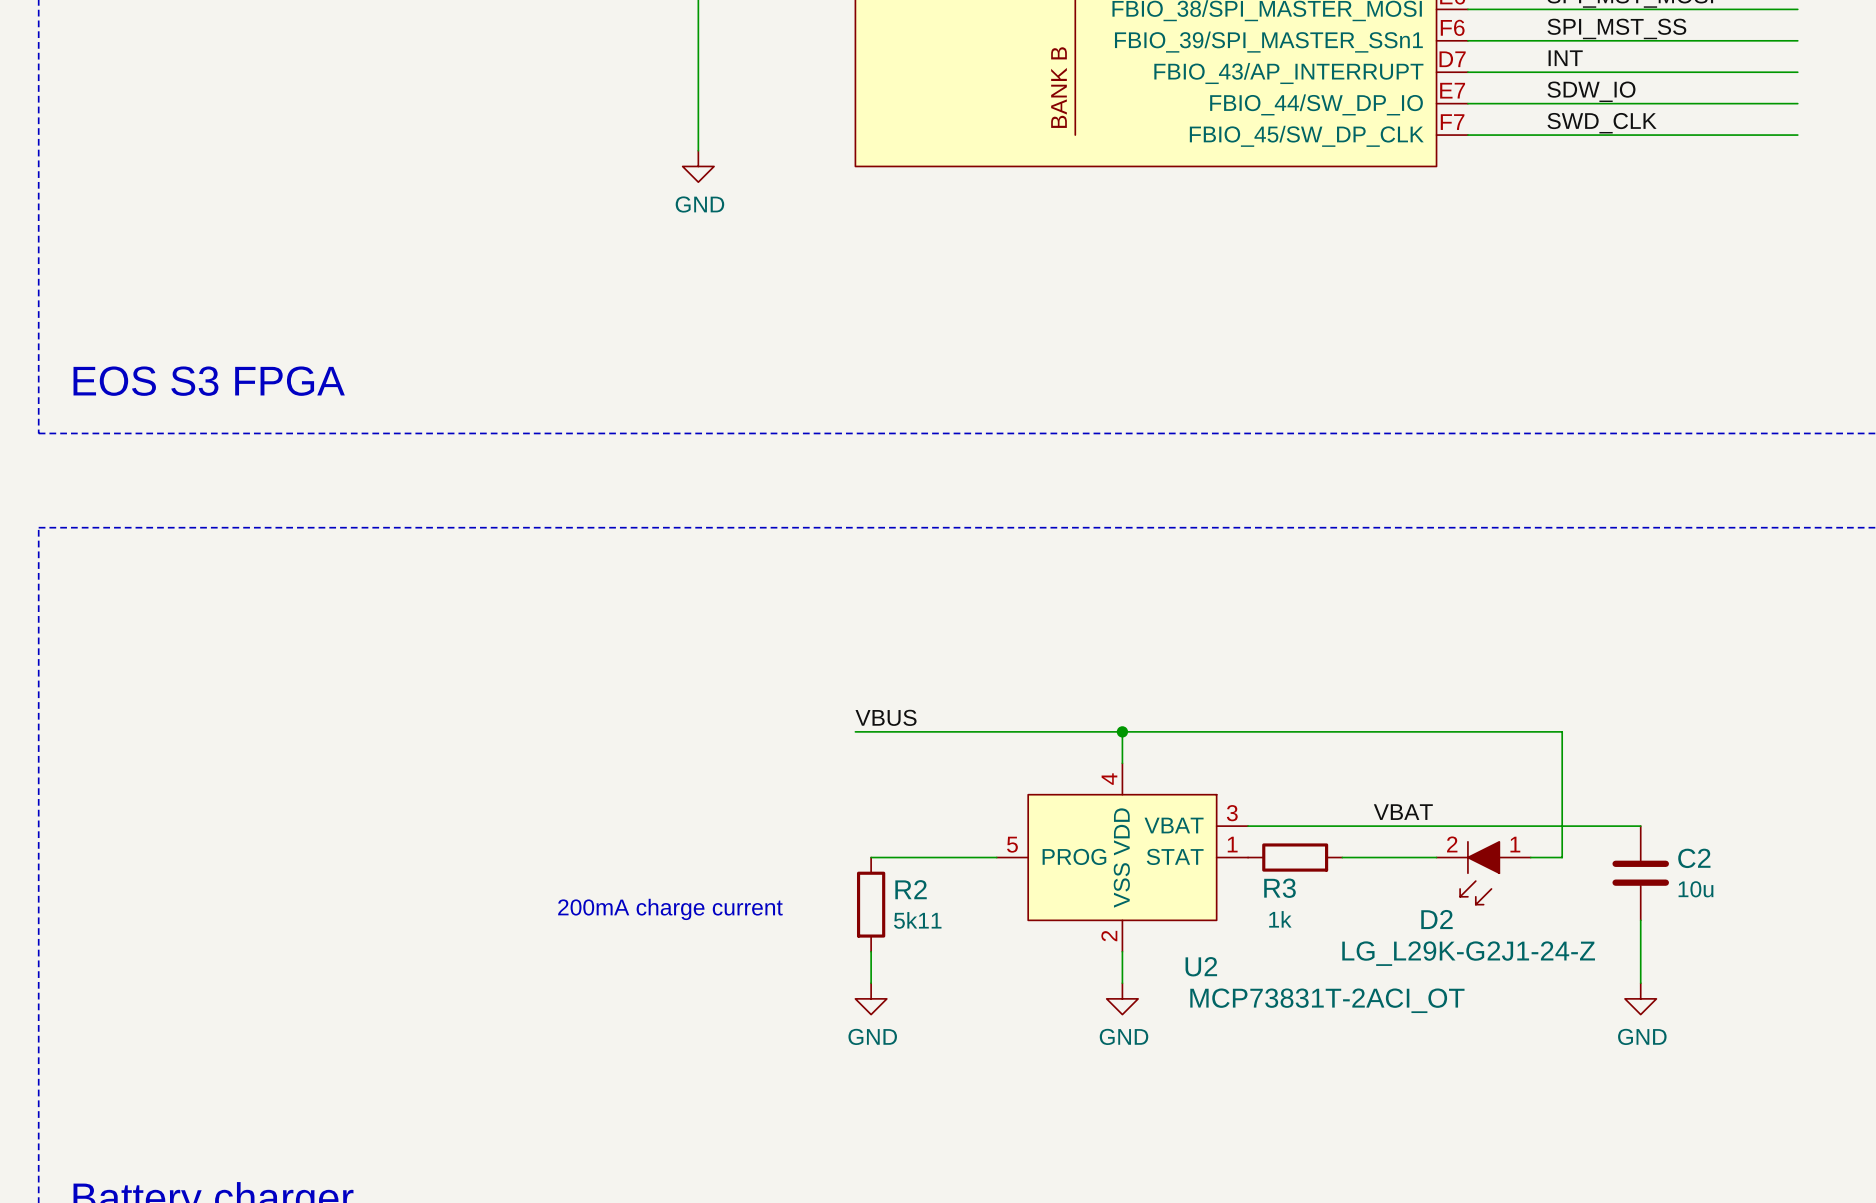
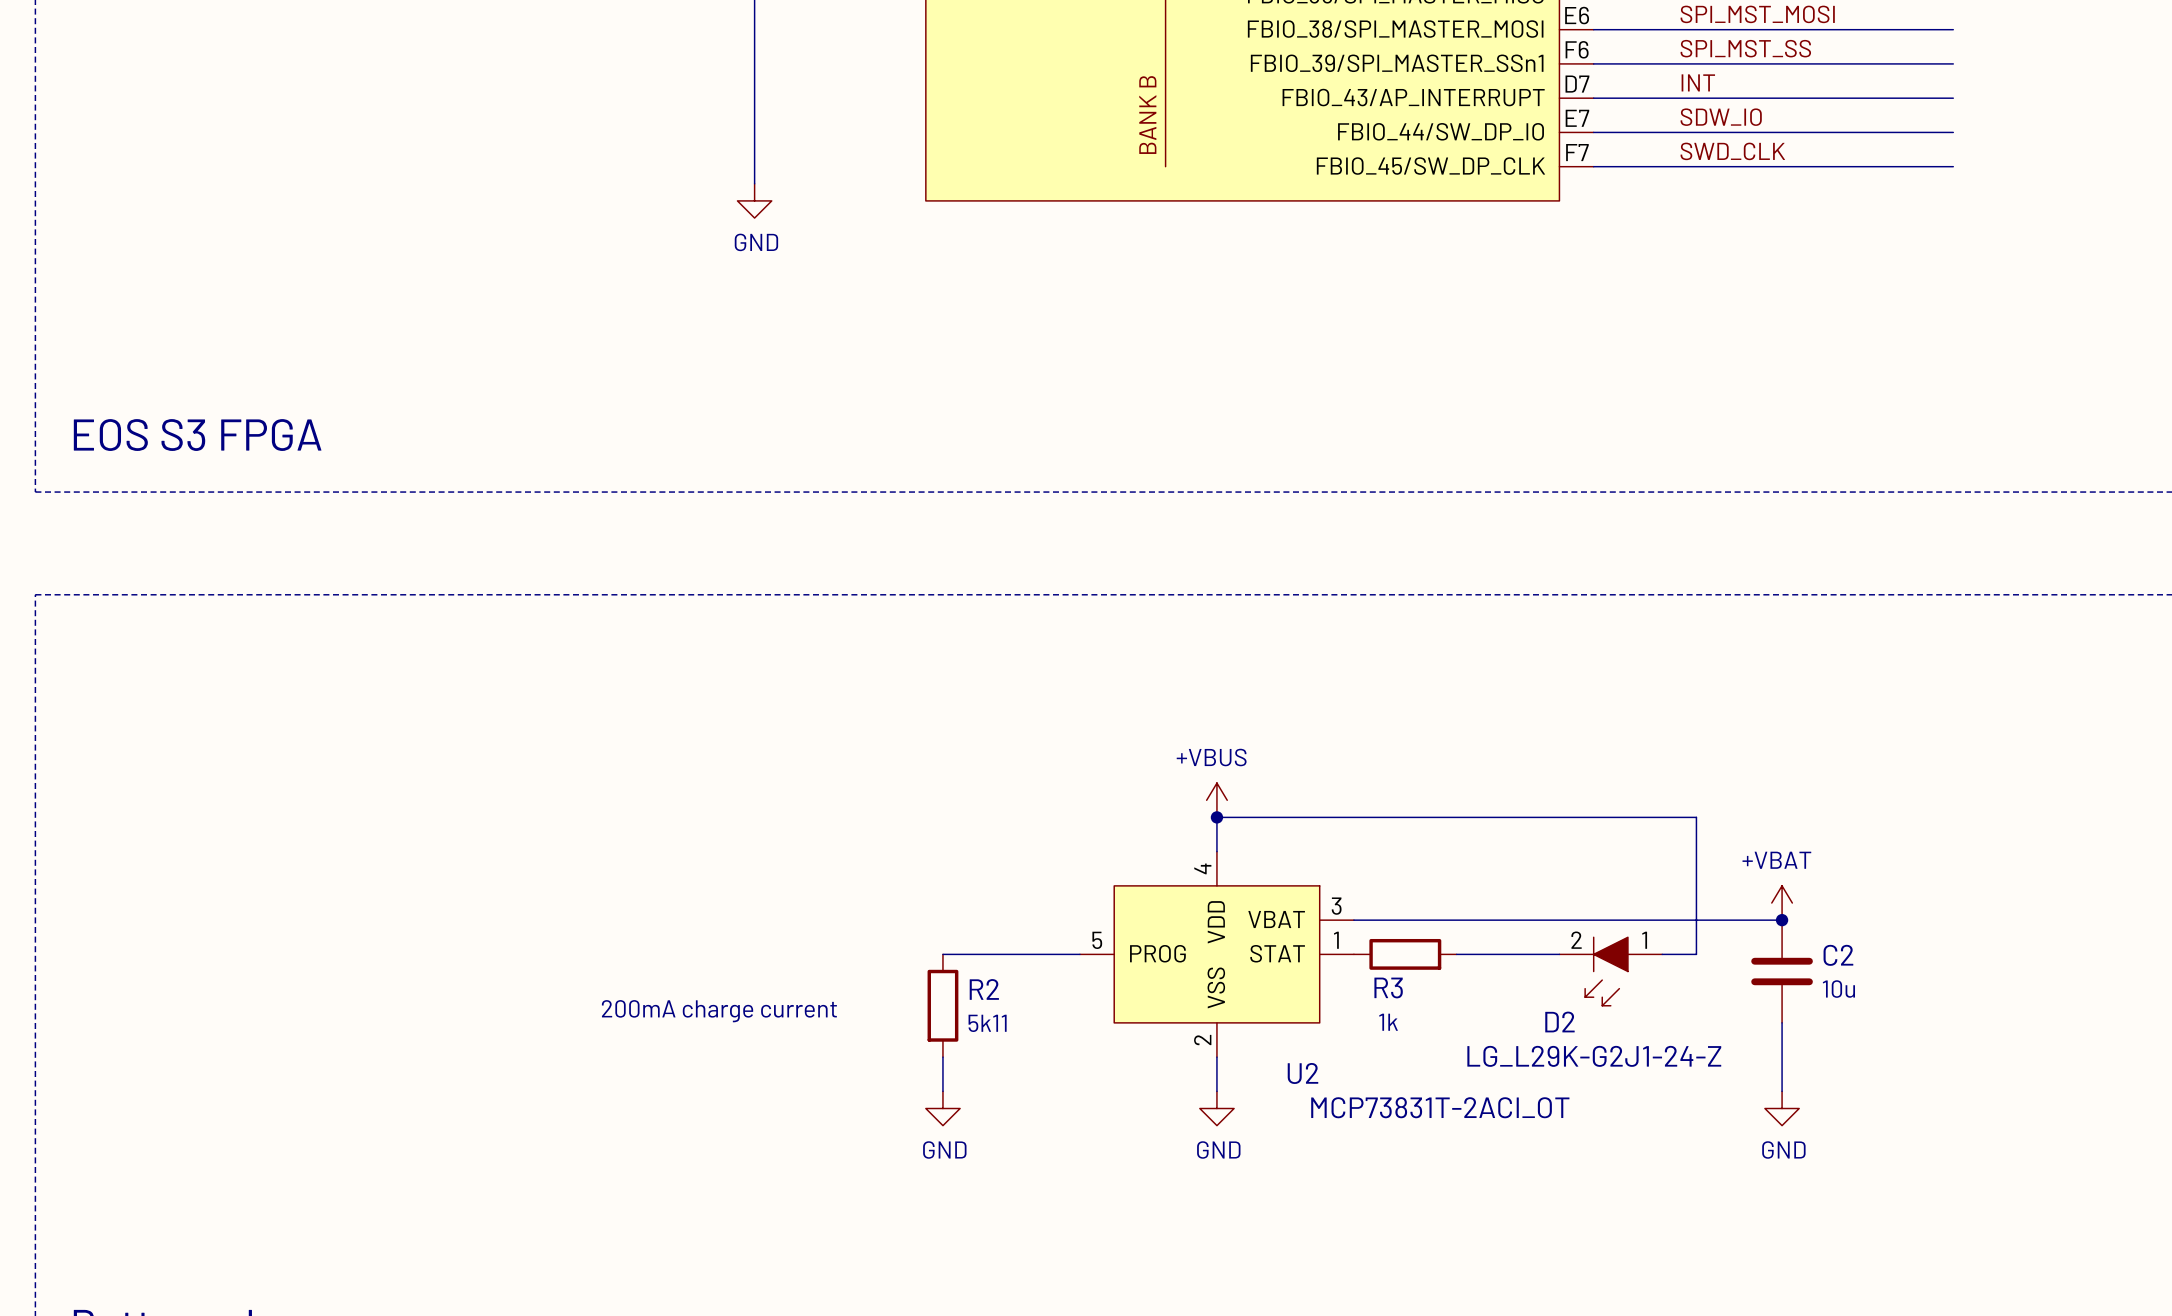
power symbol: none -> +VBUS (1216, 800)
label: VBUS (886, 717) -> none
wire: (855, 731) (1122, 731) -> none
power symbol: none -> +VBAT (1782, 903)
label: VBAT (1403, 812) -> none
junction: none -> (1782, 920)

